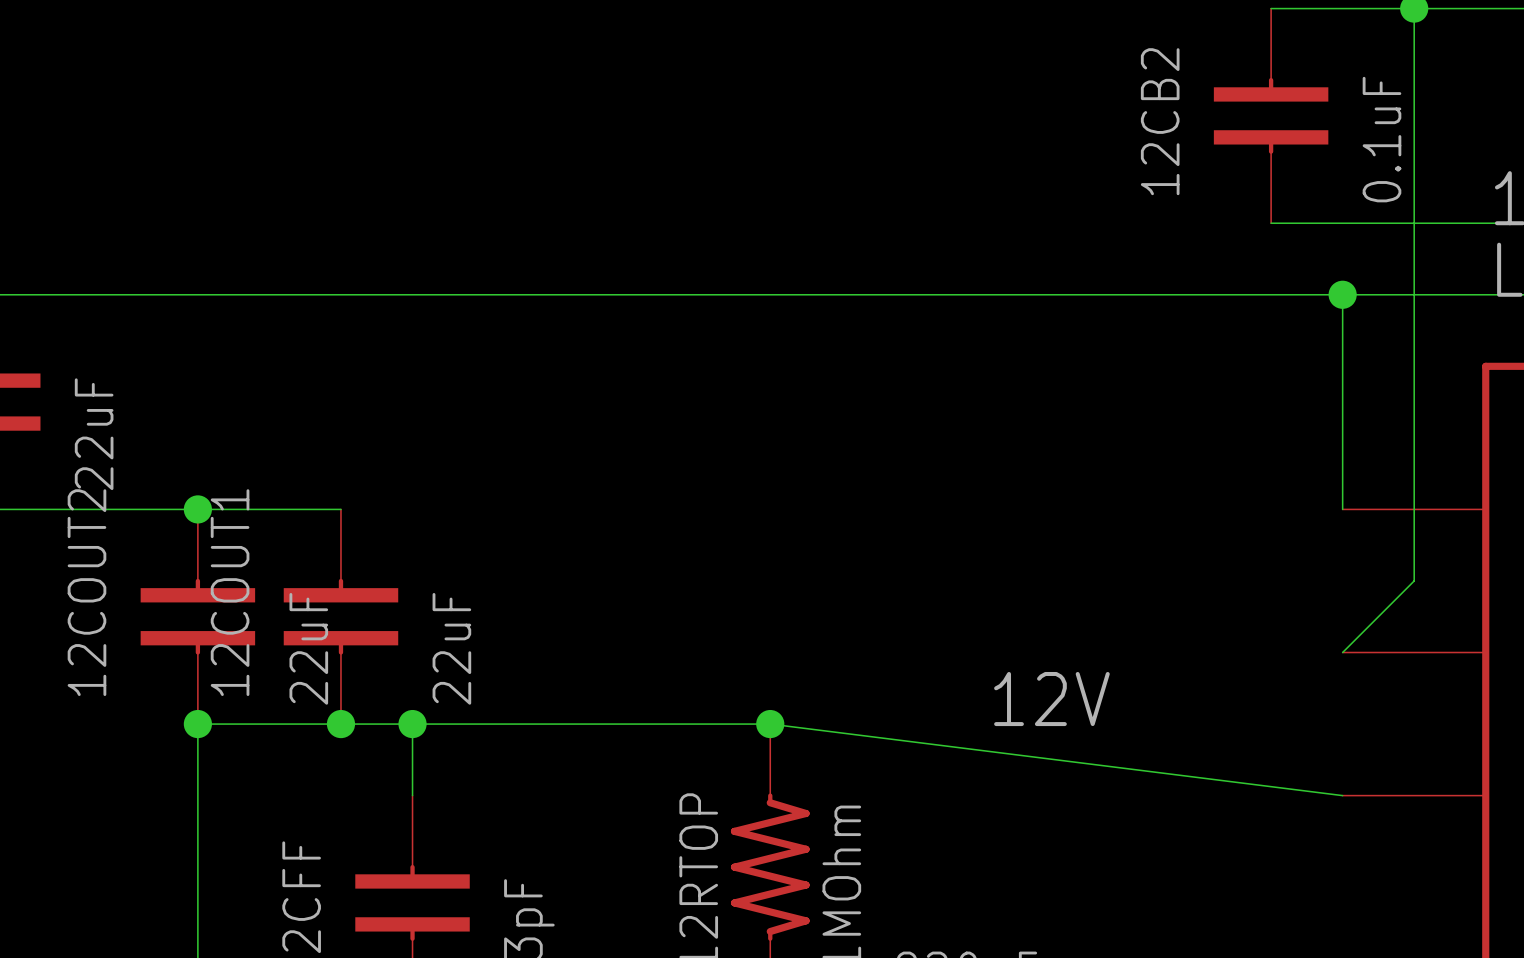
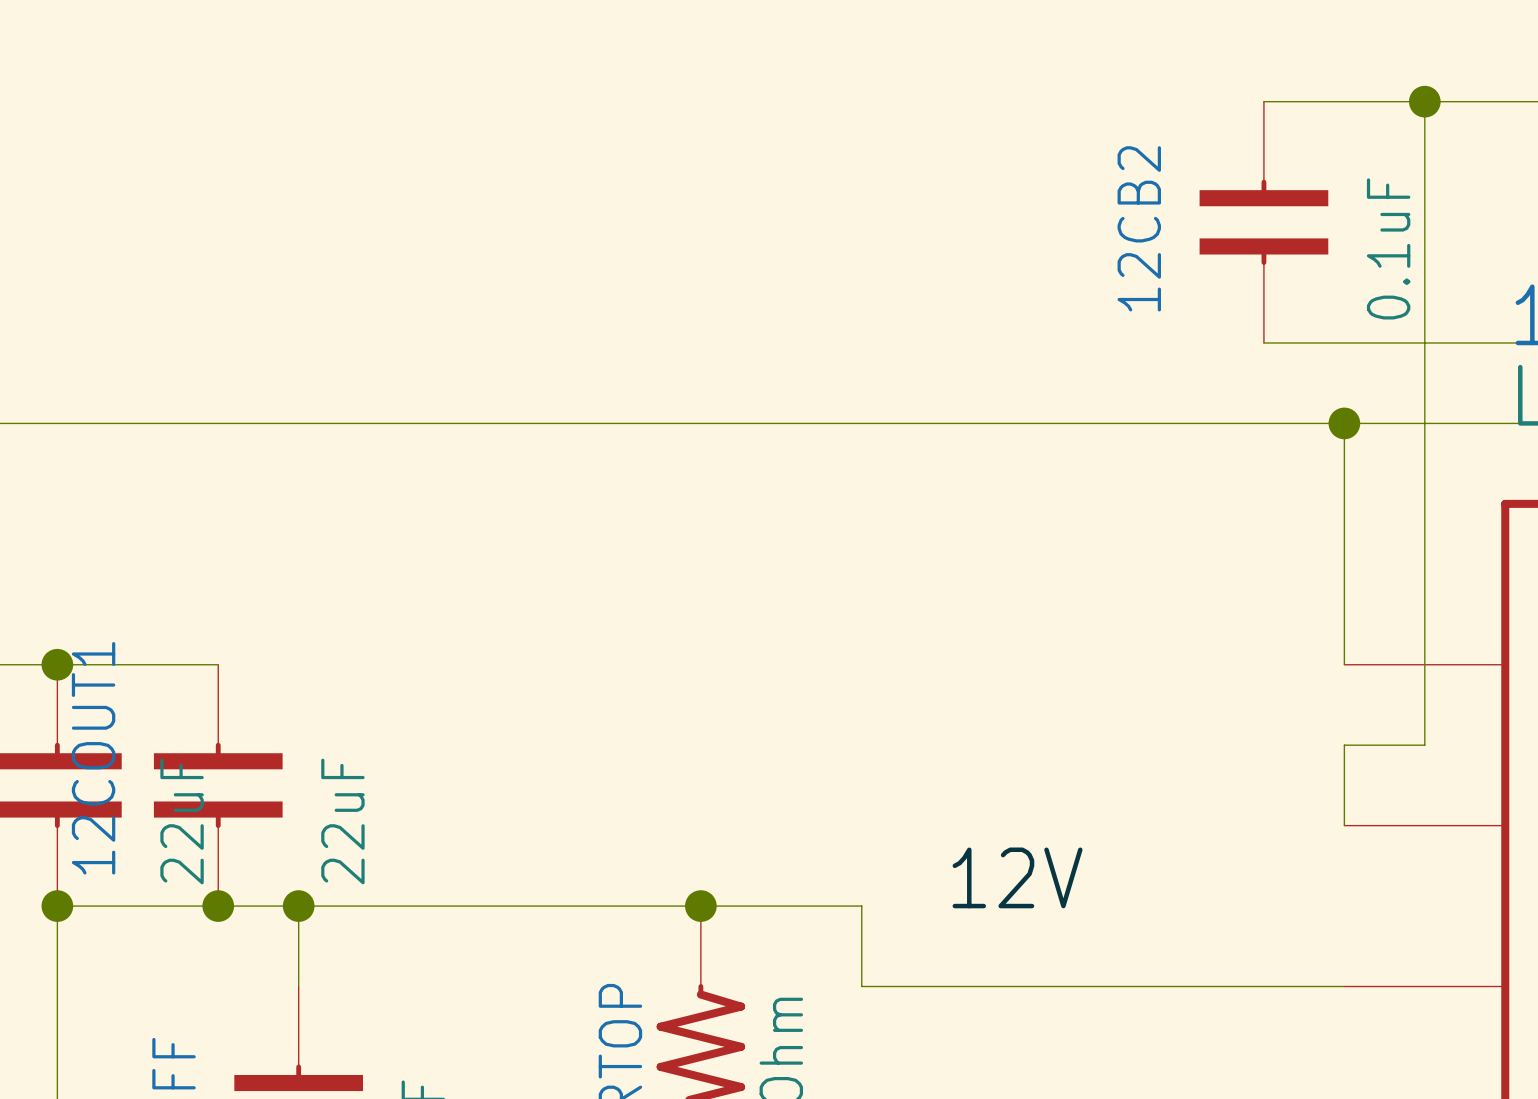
wire: (1414, 580) (1342, 652) -> (1424, 745) (1344, 745) (1344, 825)
wire: (770, 724) (1342, 795) -> (700, 906) (861, 906) (861, 986) (1344, 986)

